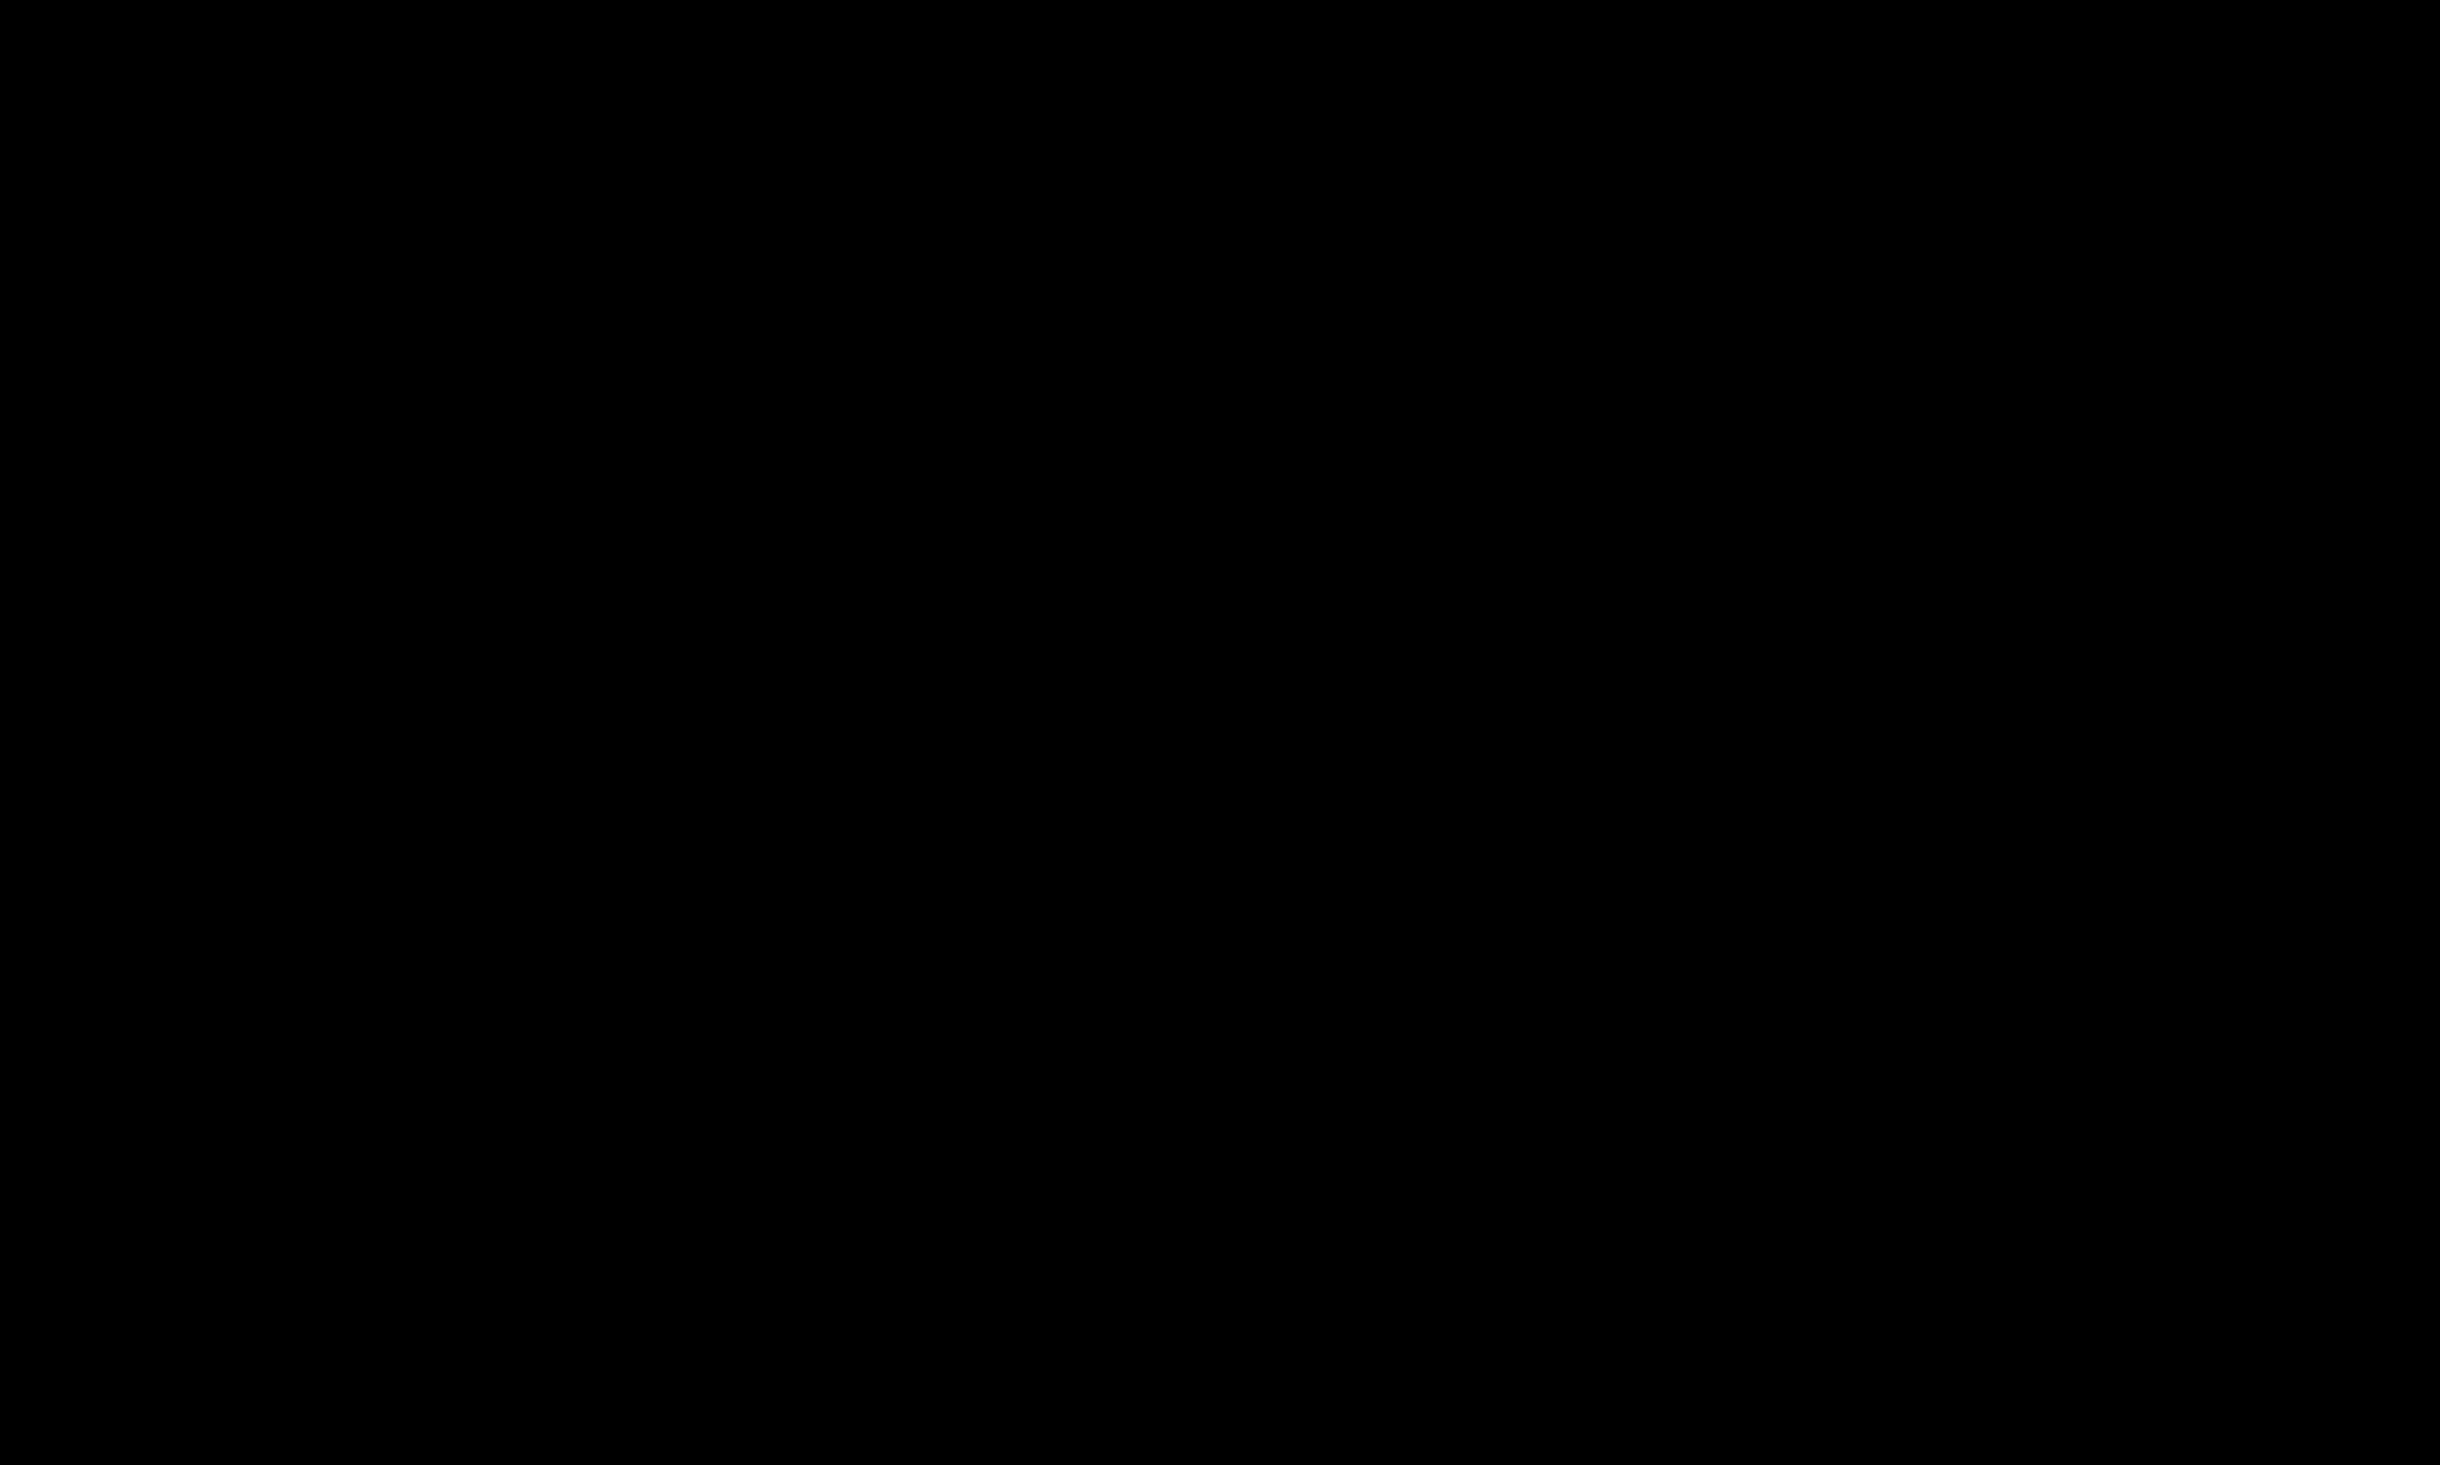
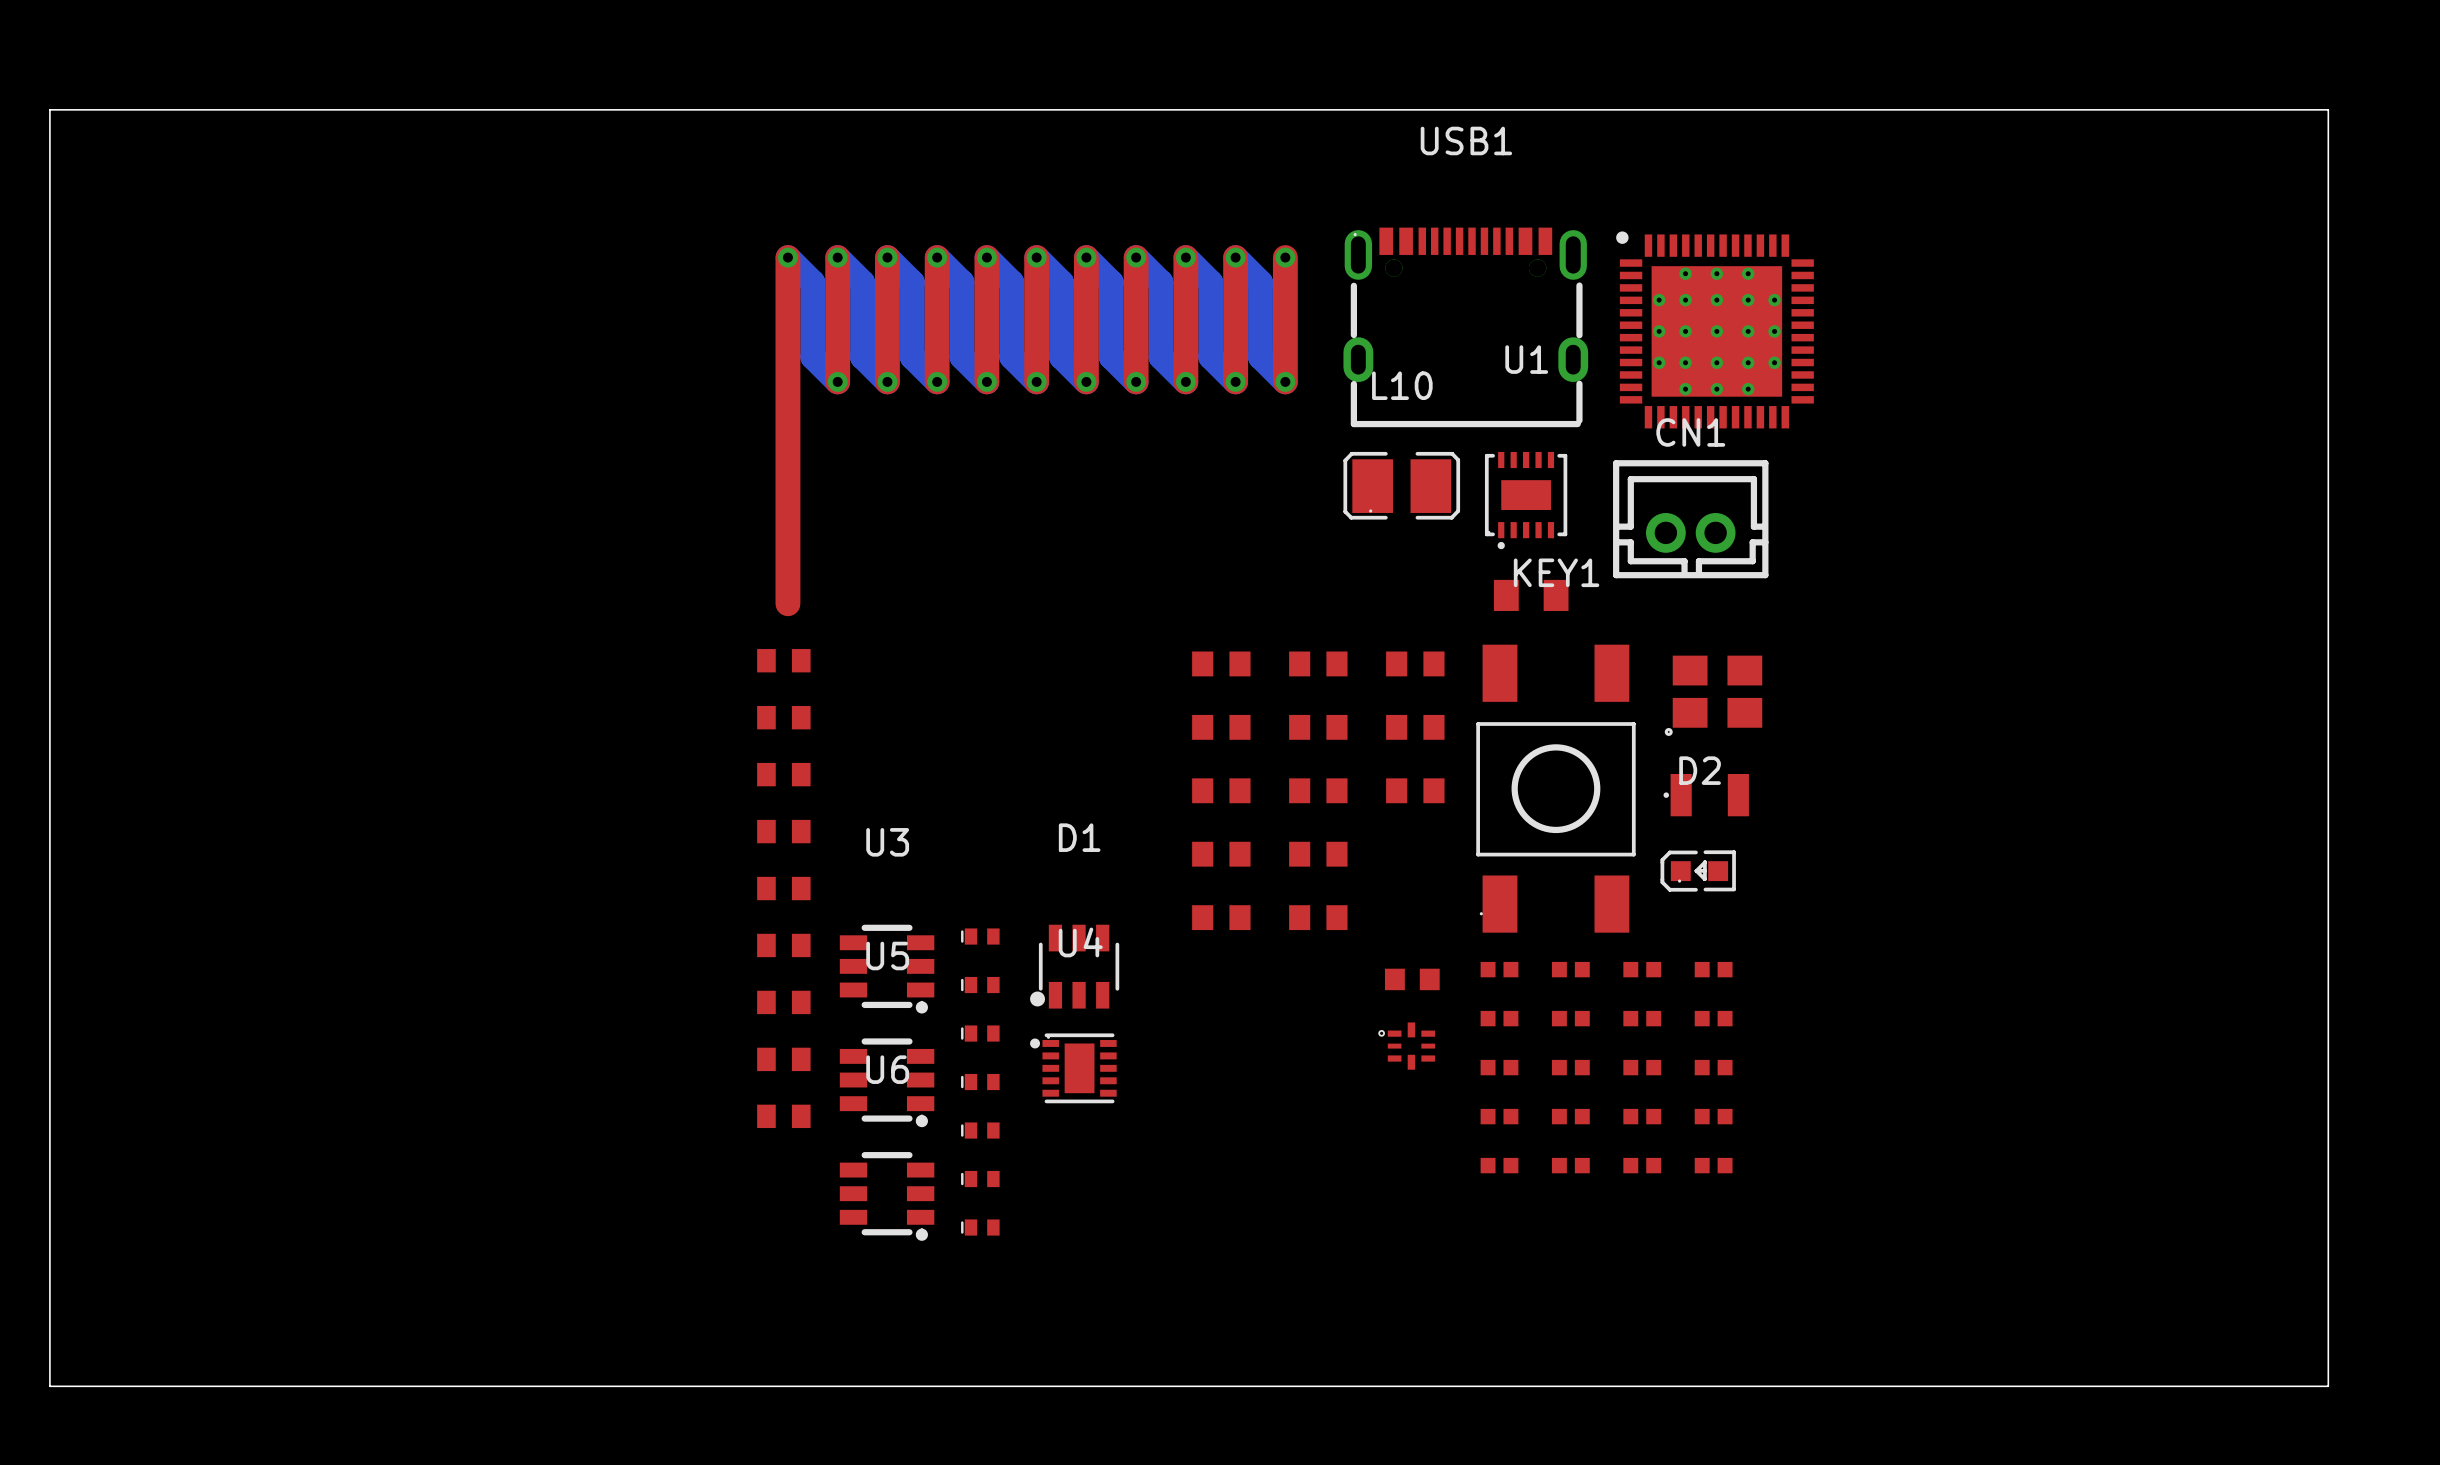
board edge: none -> (49, 109) (2328, 109) (2328, 1386) (49, 1386) (49, 109)
USB1: none -> (1465, 327)
part: none -> (1715, 329)
part: none -> (1036, 430)
L10: none -> (1401, 485)
U1: none -> (1526, 500)
CN1: none -> (1690, 519)
part: none -> (1531, 595)
part: none -> (783, 660)
part: none -> (1221, 663)
part: none -> (1318, 663)
part: none -> (1415, 663)
part: none -> (1713, 695)
part: none -> (783, 717)
part: none -> (1221, 727)
part: none -> (1318, 727)
part: none -> (1415, 727)
part: none -> (783, 774)
KEY1: none -> (1555, 788)
part: none -> (1221, 790)
part: none -> (1318, 790)
part: none -> (1415, 790)
part: none -> (1706, 795)
part: none -> (783, 831)
part: none -> (1221, 854)
part: none -> (1318, 854)
D2: none -> (1698, 870)
part: none -> (783, 888)
part: none -> (1221, 917)
part: none -> (1318, 917)
part: none -> (980, 936)
part: none -> (783, 945)
D1: none -> (1074, 966)
U3: none -> (887, 969)
part: none -> (1499, 969)
part: none -> (1570, 969)
part: none -> (1642, 969)
part: none -> (1713, 969)
part: none -> (1412, 979)
part: none -> (980, 985)
part: none -> (783, 1002)
part: none -> (1499, 1018)
part: none -> (1570, 1018)
part: none -> (1642, 1018)
part: none -> (1713, 1018)
part: none -> (980, 1033)
part: none -> (1406, 1046)
part: none -> (783, 1059)
part: none -> (1499, 1067)
part: none -> (1570, 1067)
part: none -> (1642, 1067)
part: none -> (1713, 1067)
U4: none -> (1073, 1068)
U5: none -> (887, 1082)
part: none -> (980, 1082)
part: none -> (783, 1116)
part: none -> (1499, 1116)
part: none -> (1570, 1116)
part: none -> (1642, 1116)
part: none -> (1713, 1116)
part: none -> (980, 1130)
part: none -> (1499, 1165)
part: none -> (1570, 1165)
part: none -> (1642, 1165)
part: none -> (1713, 1165)
part: none -> (980, 1179)
U6: none -> (887, 1196)
part: none -> (980, 1227)

